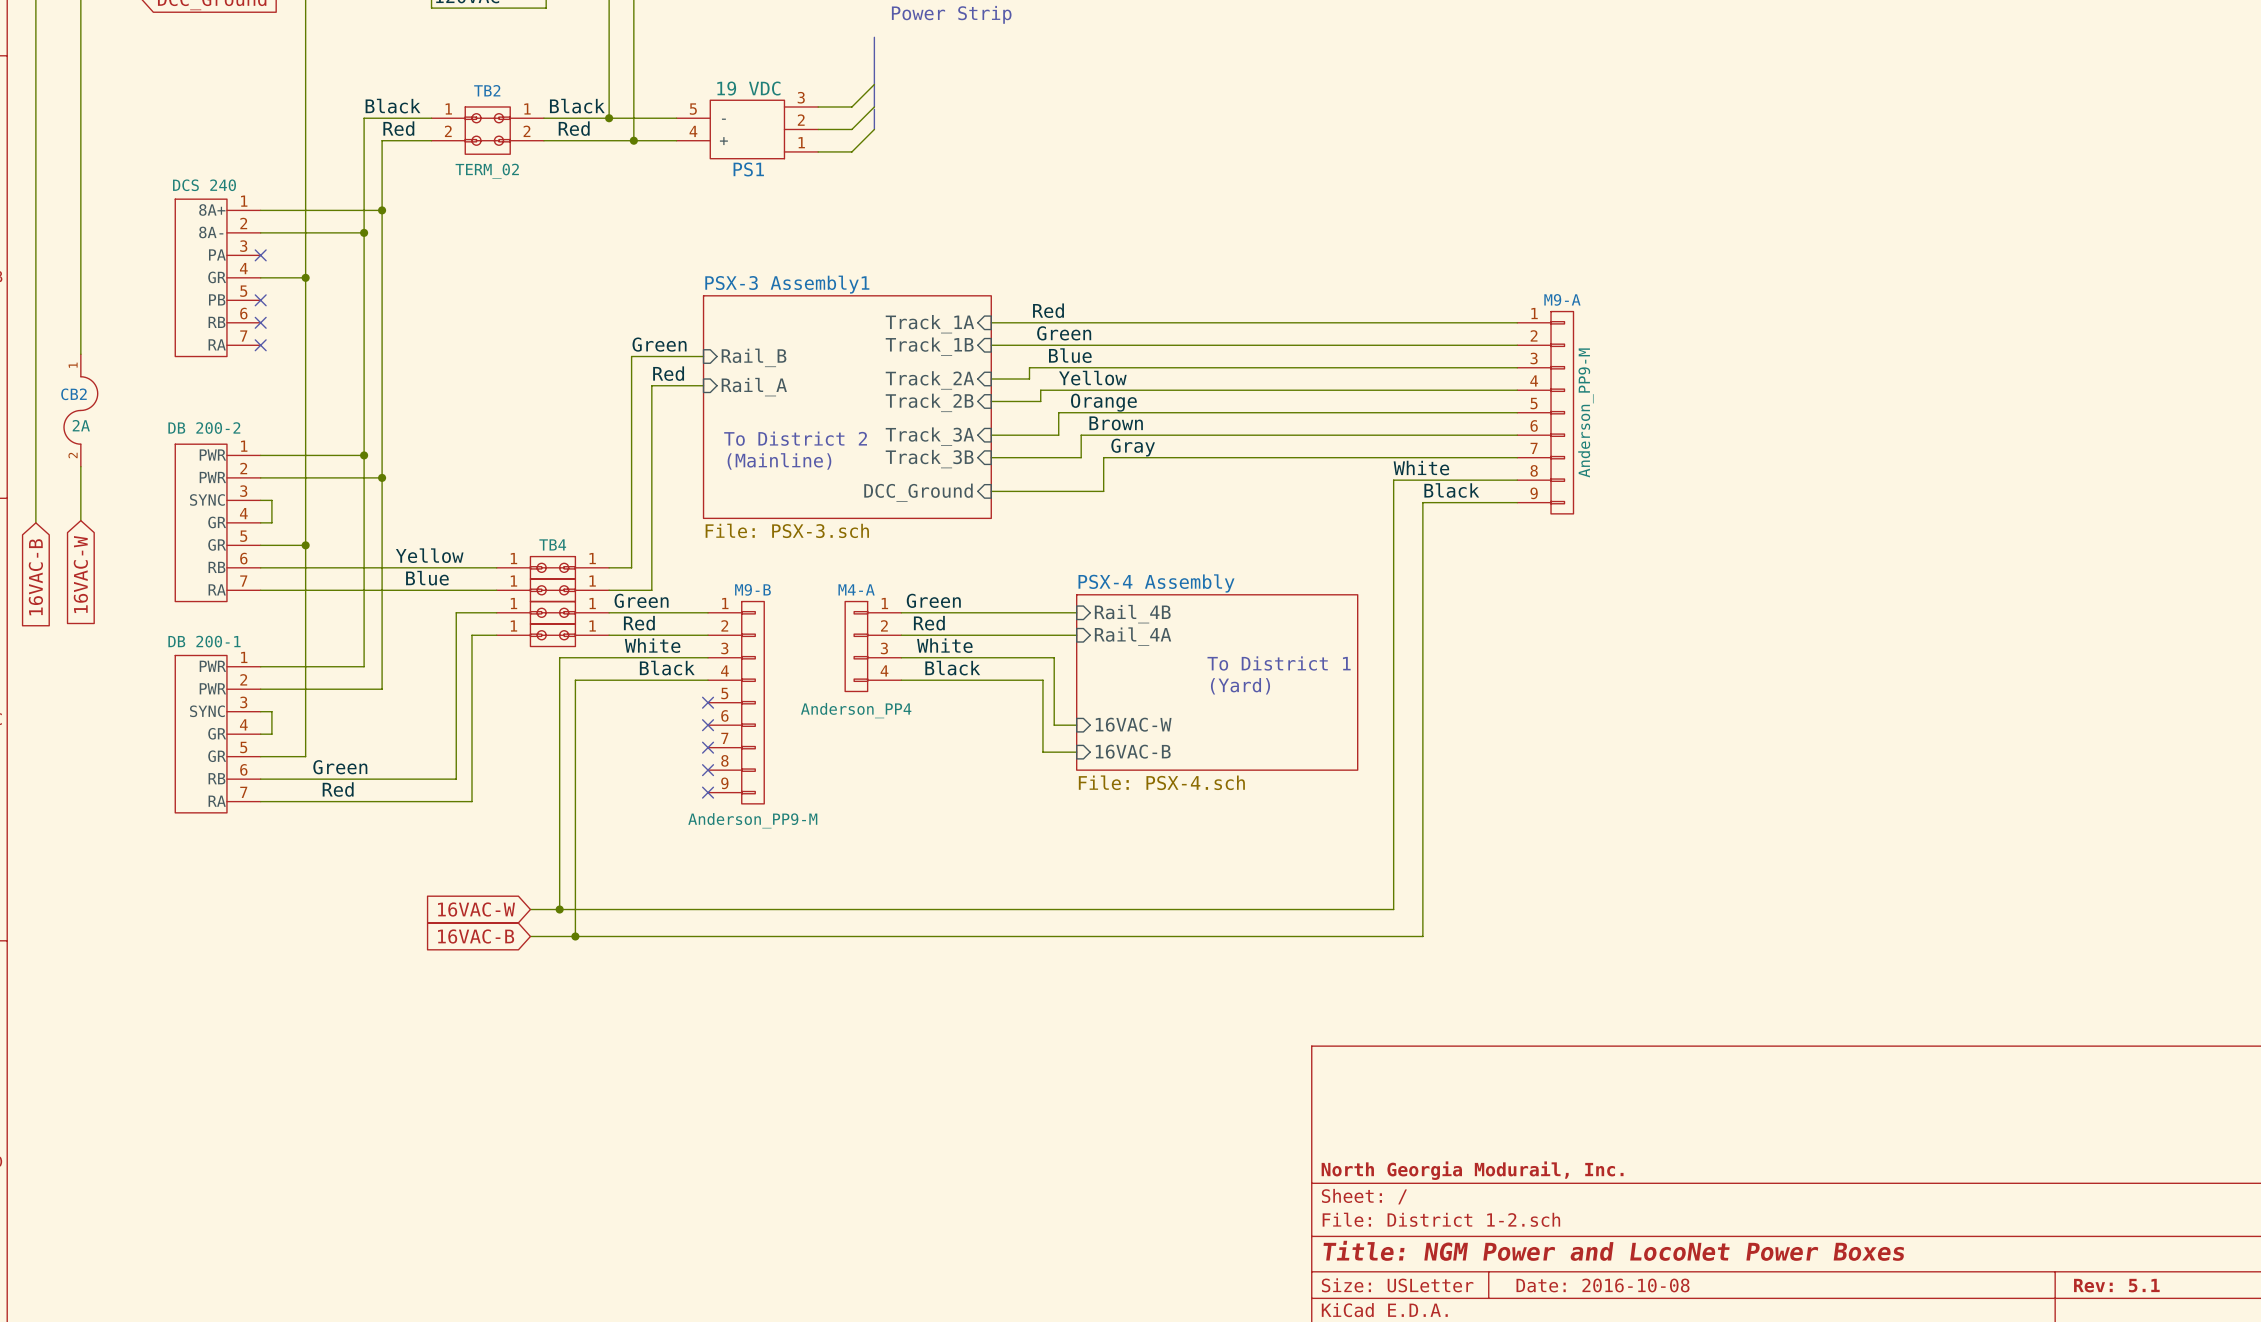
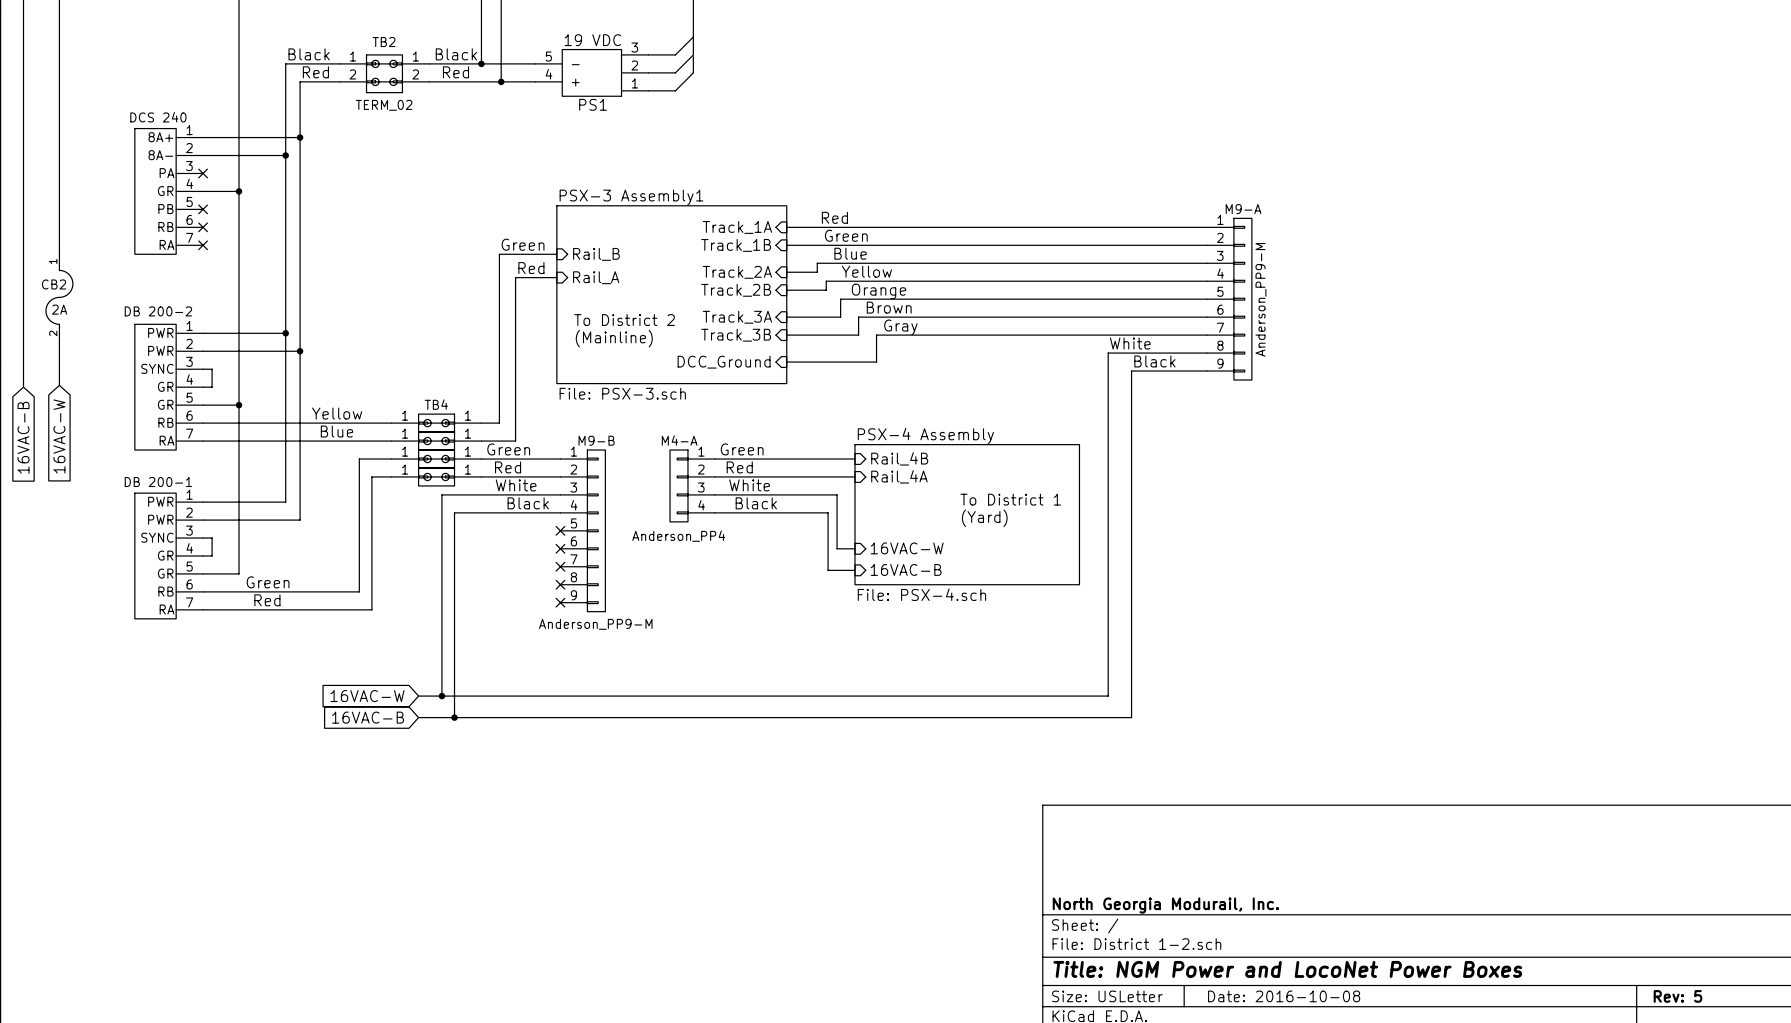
title block: Rev: 5.1 (2116, 1285) -> Rev: 5 (1677, 996)

